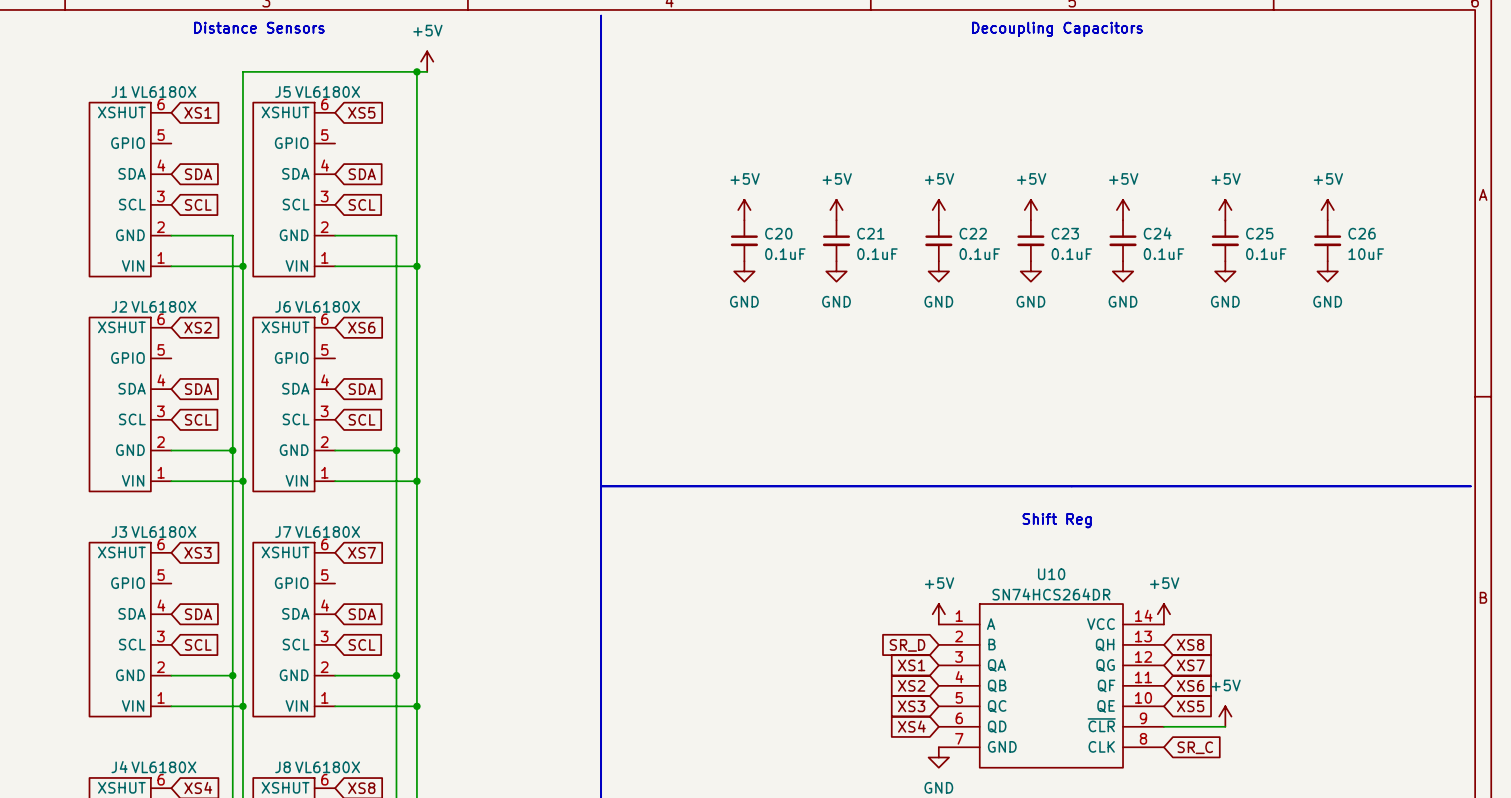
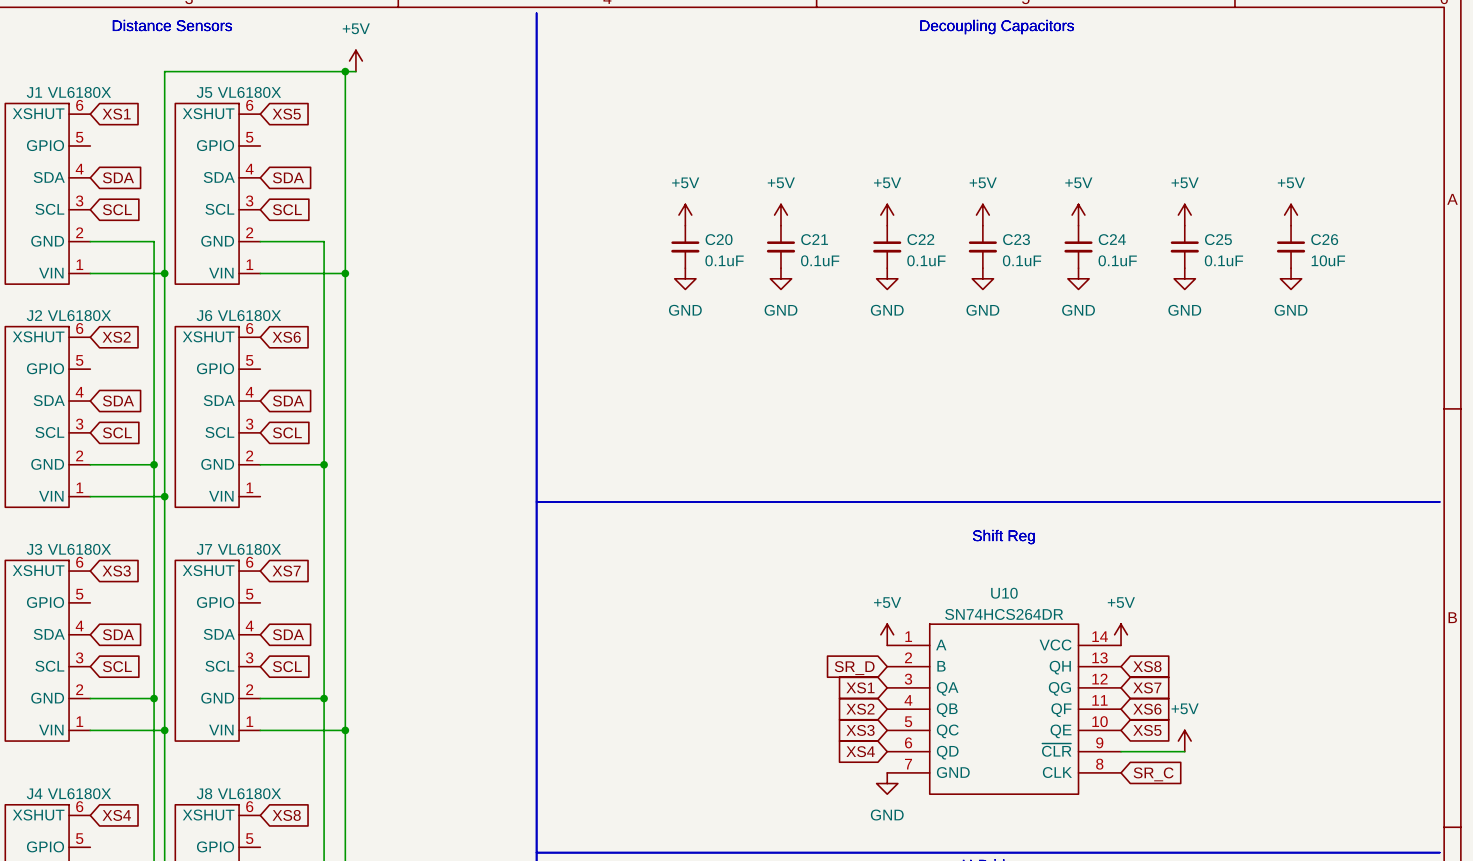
wire: (335, 481) (416, 481) -> none
junction: (416, 481) -> none

